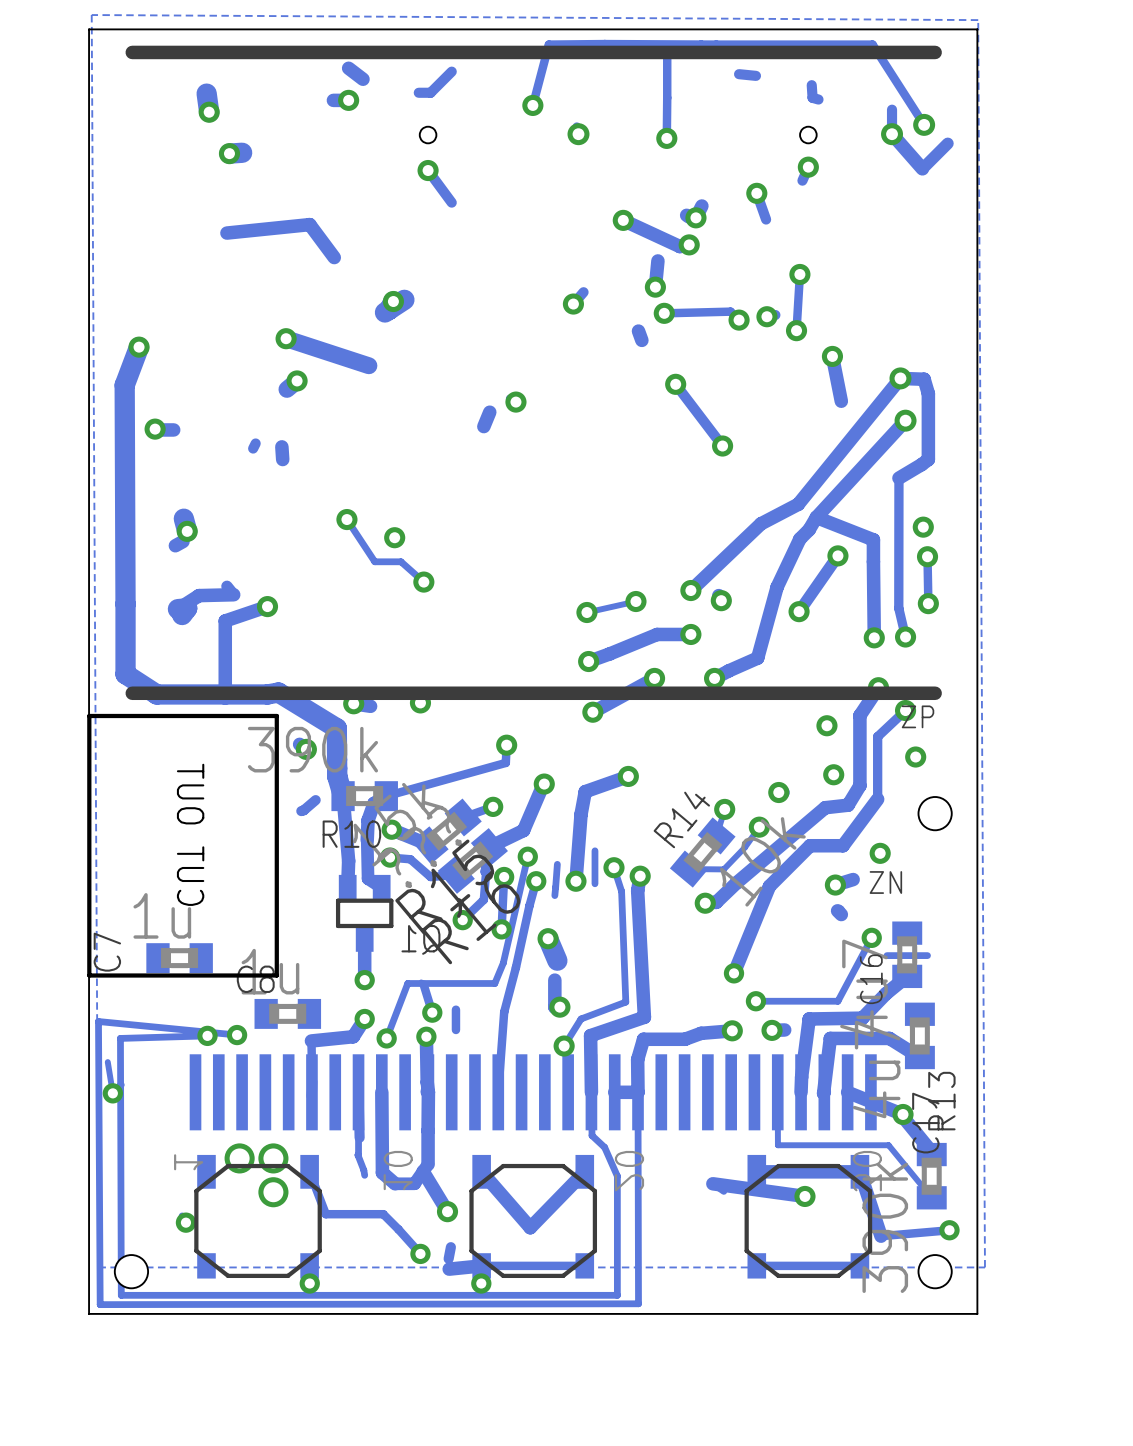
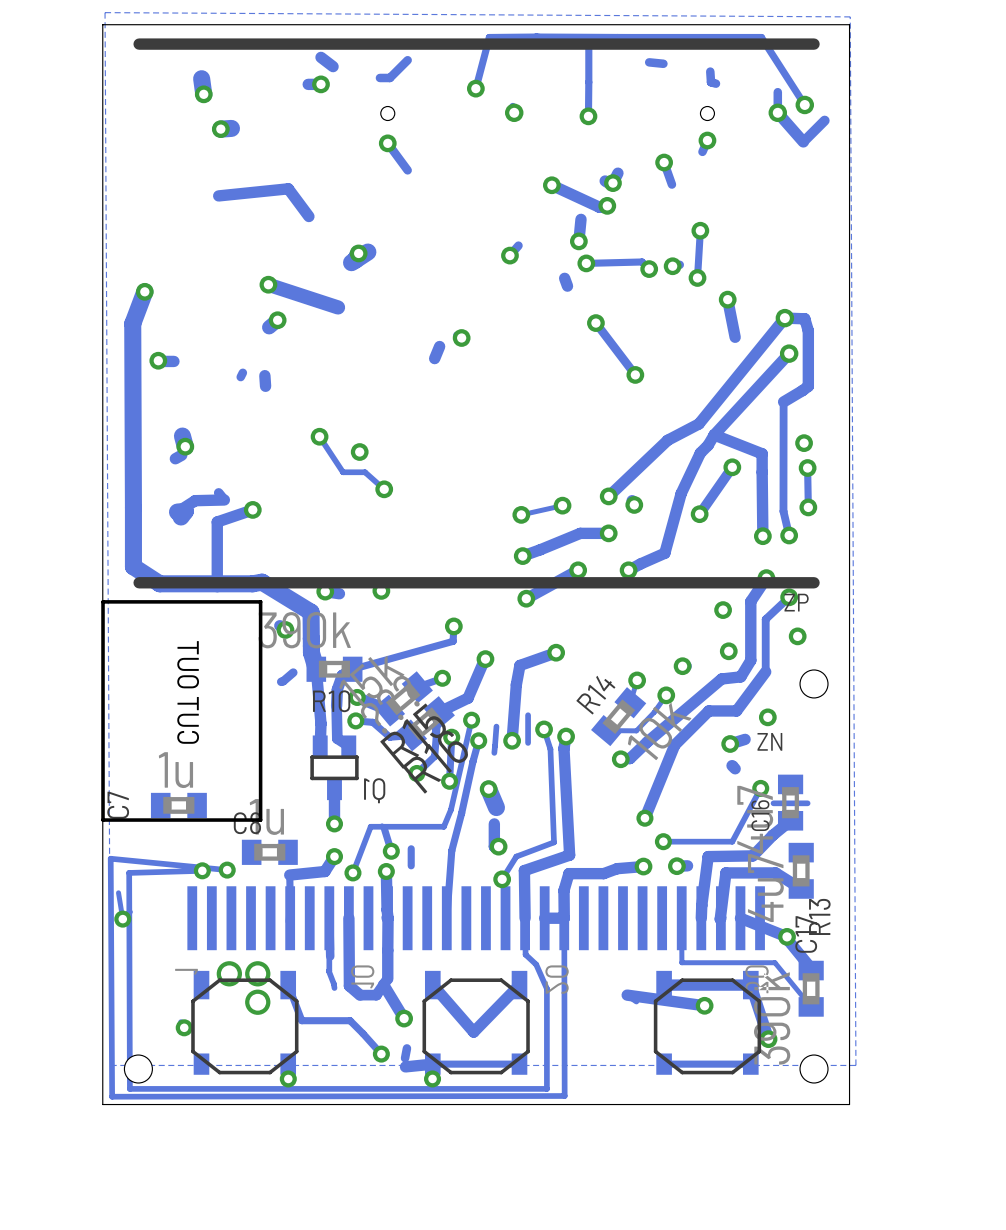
track: (949, 1230) (881, 1236) -> none
via: (949, 1230) -> none
via: none -> (768, 1039)

